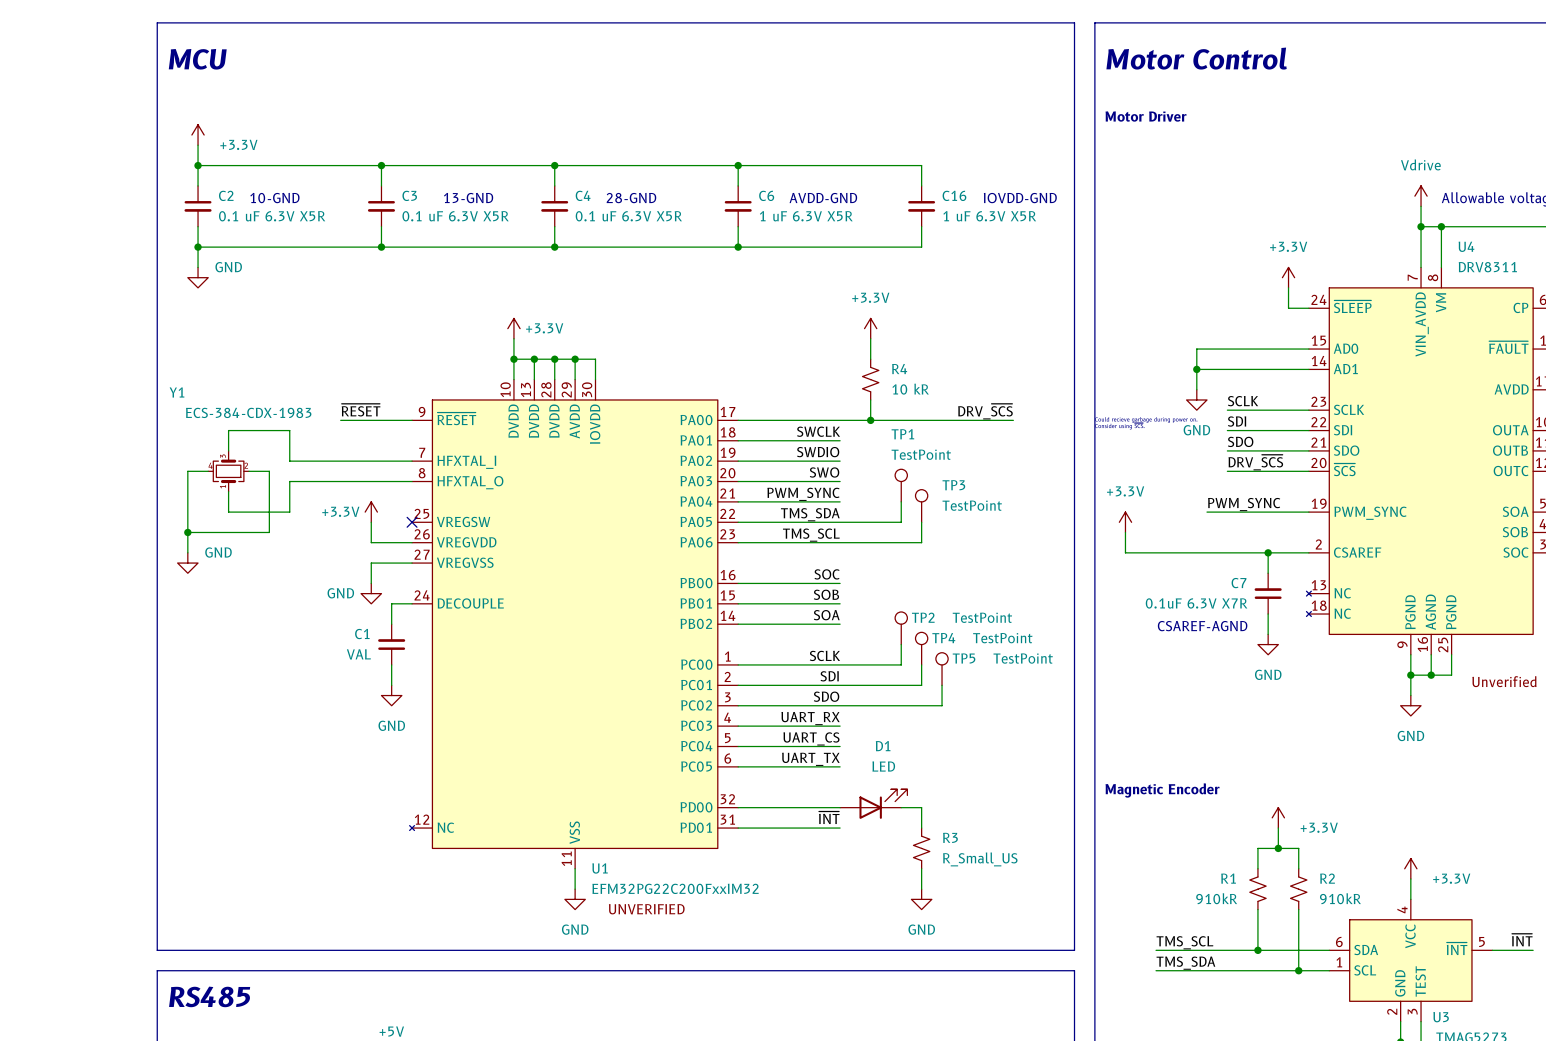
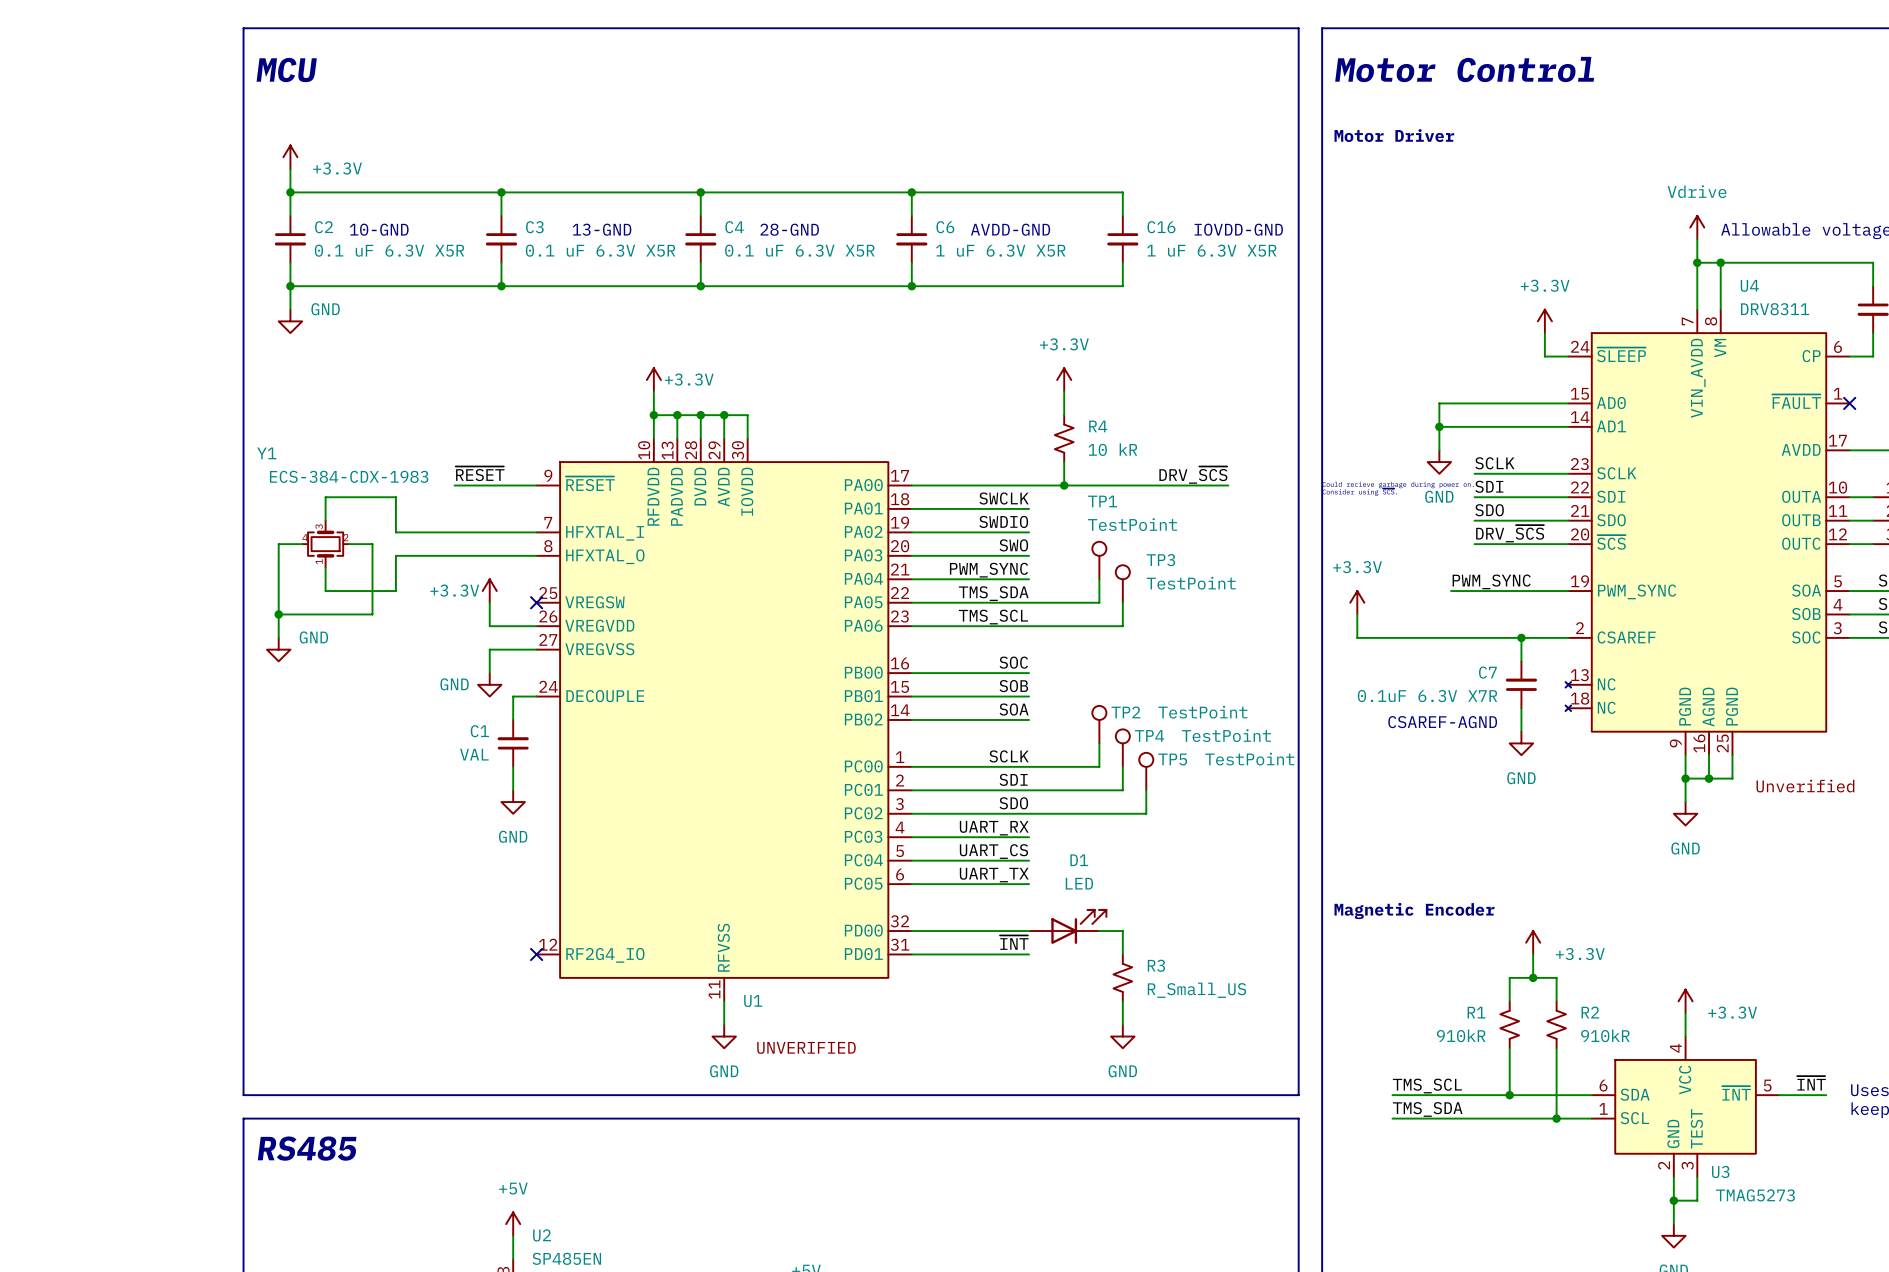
U1 symbol: [409, 379, 739, 869] -> [536, 438, 912, 1002]
no-connect mark: none -> (536, 954)
U1 value: EFM32PG22C200FxxIM32 (675, 888) -> none

